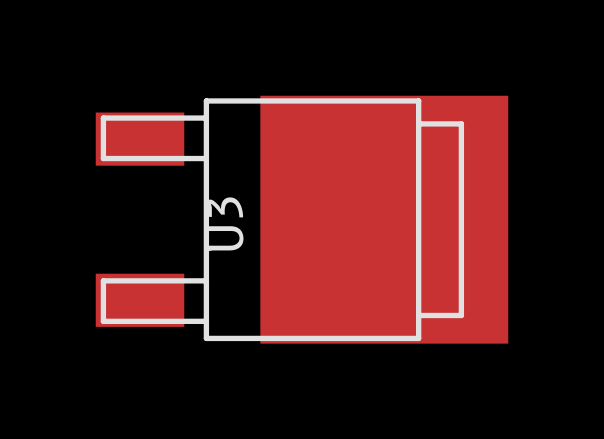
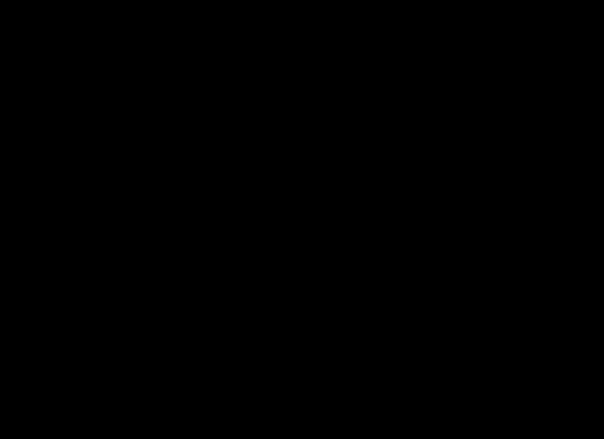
U3: (302, 219) -> none

